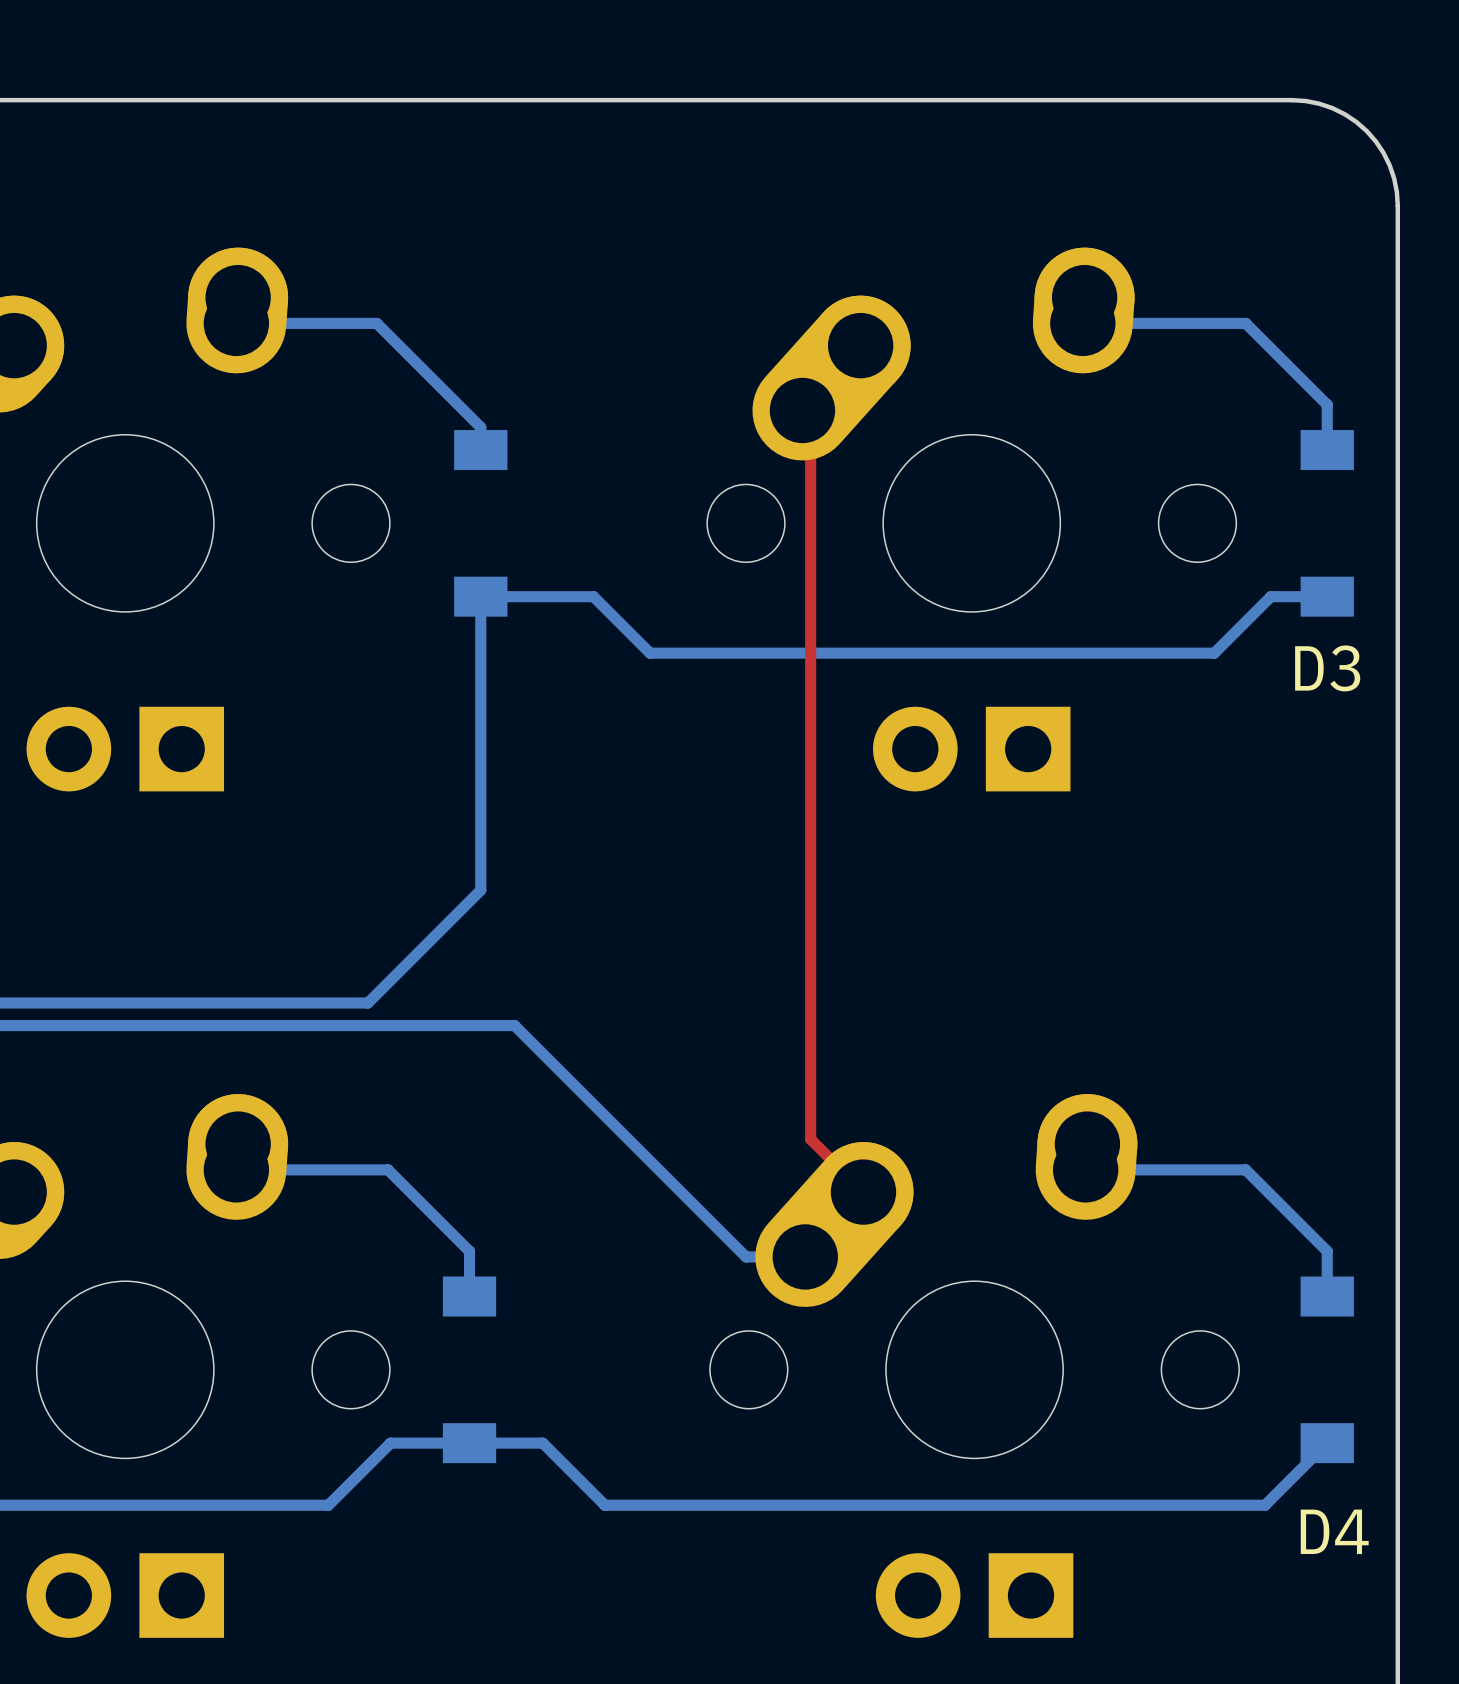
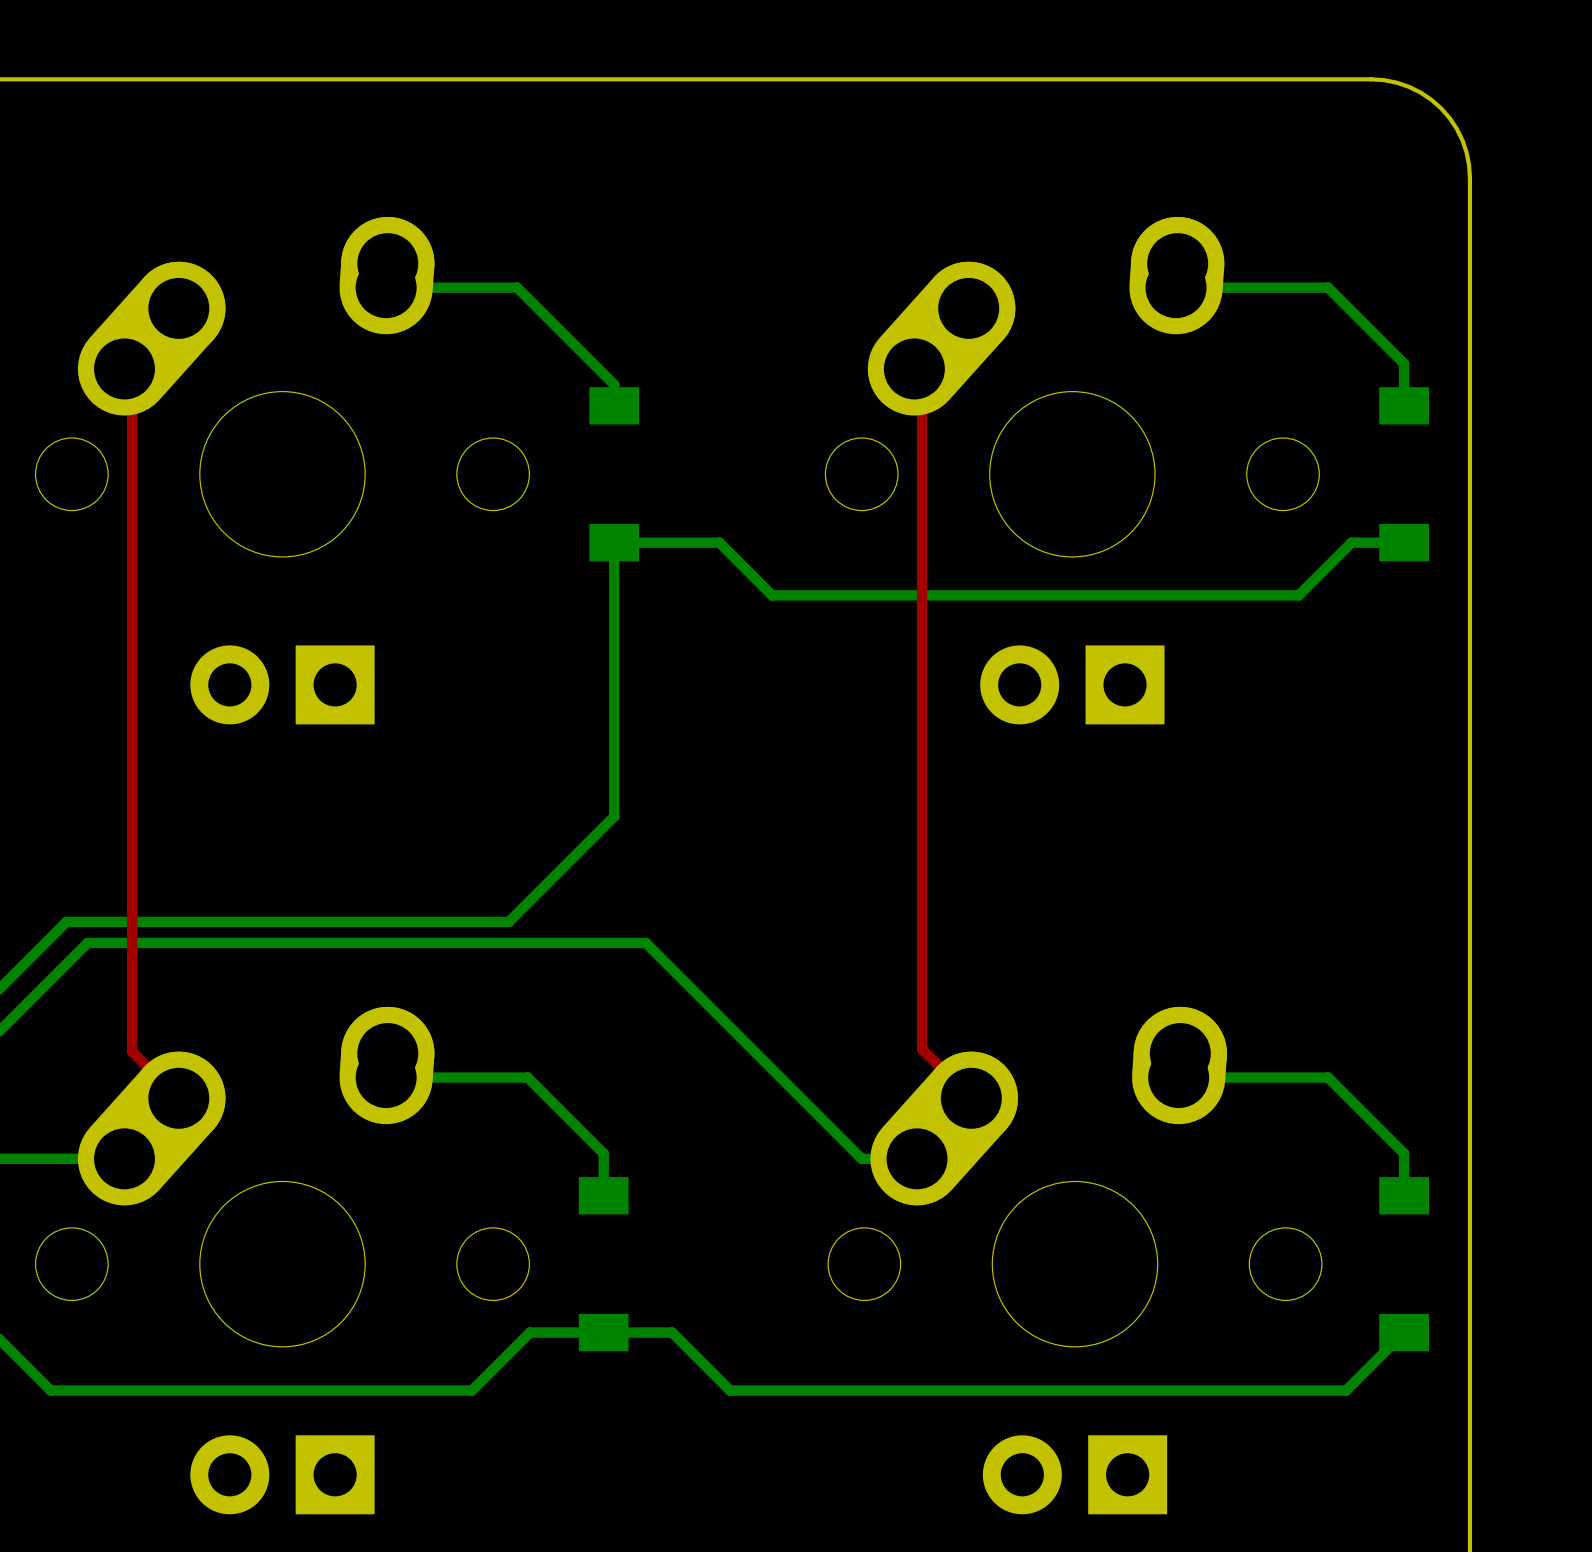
D3 name: D3 (1327, 668) -> none
D4 name: D4 (1334, 1531) -> none

